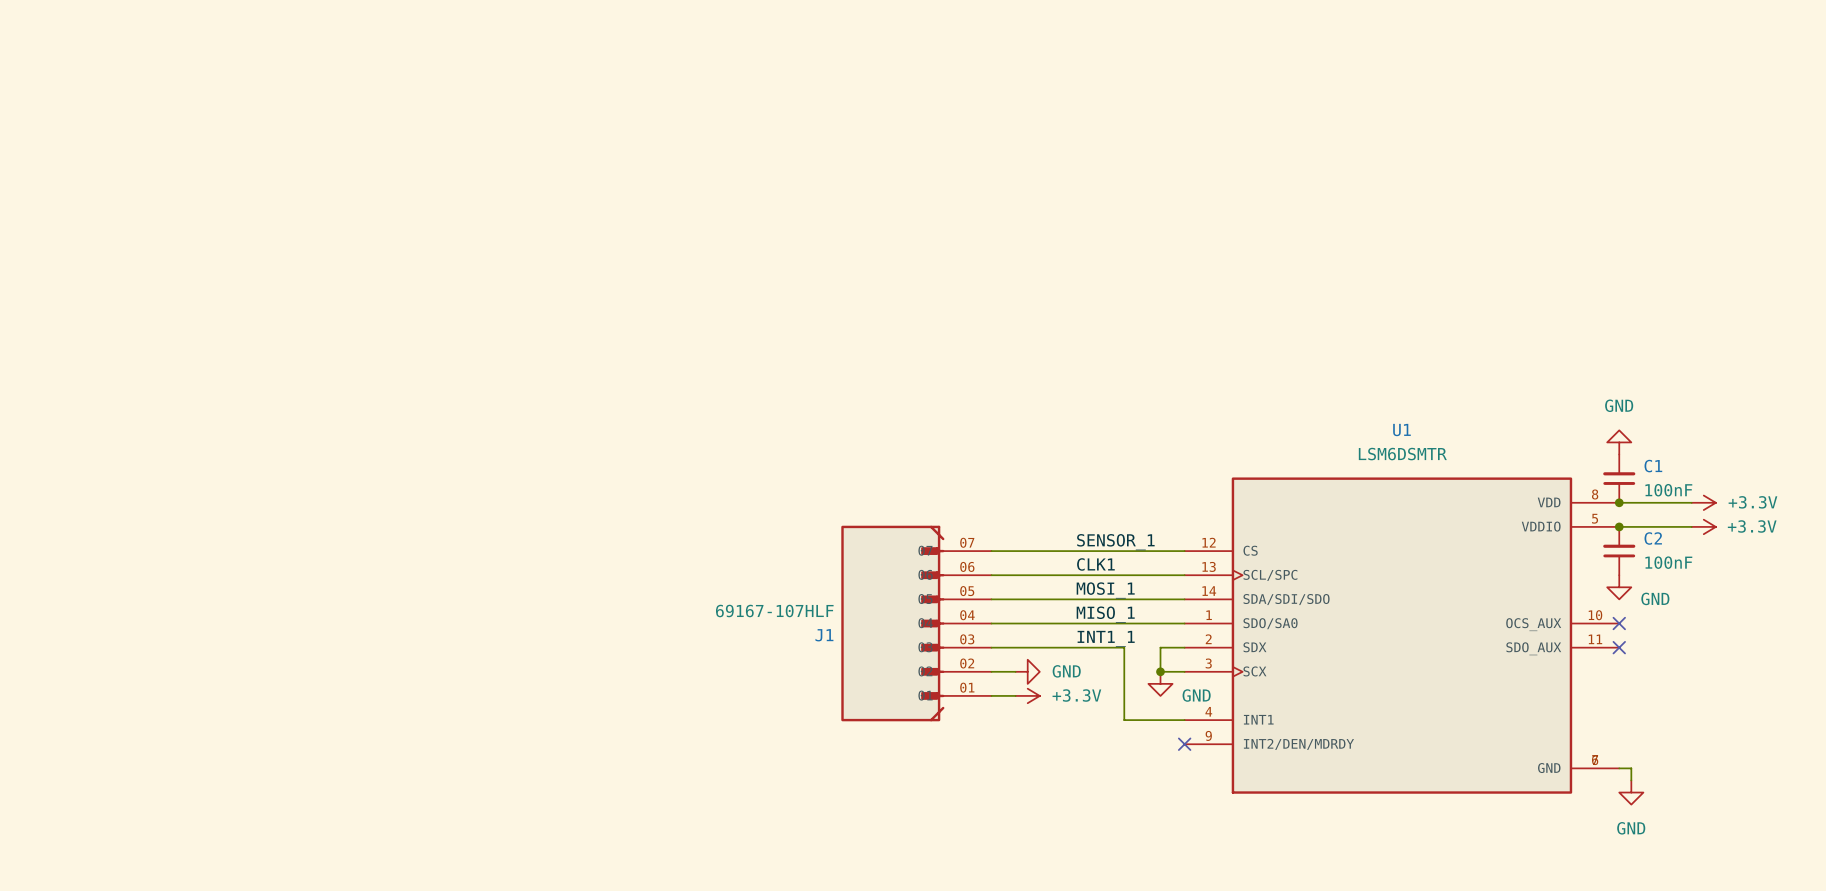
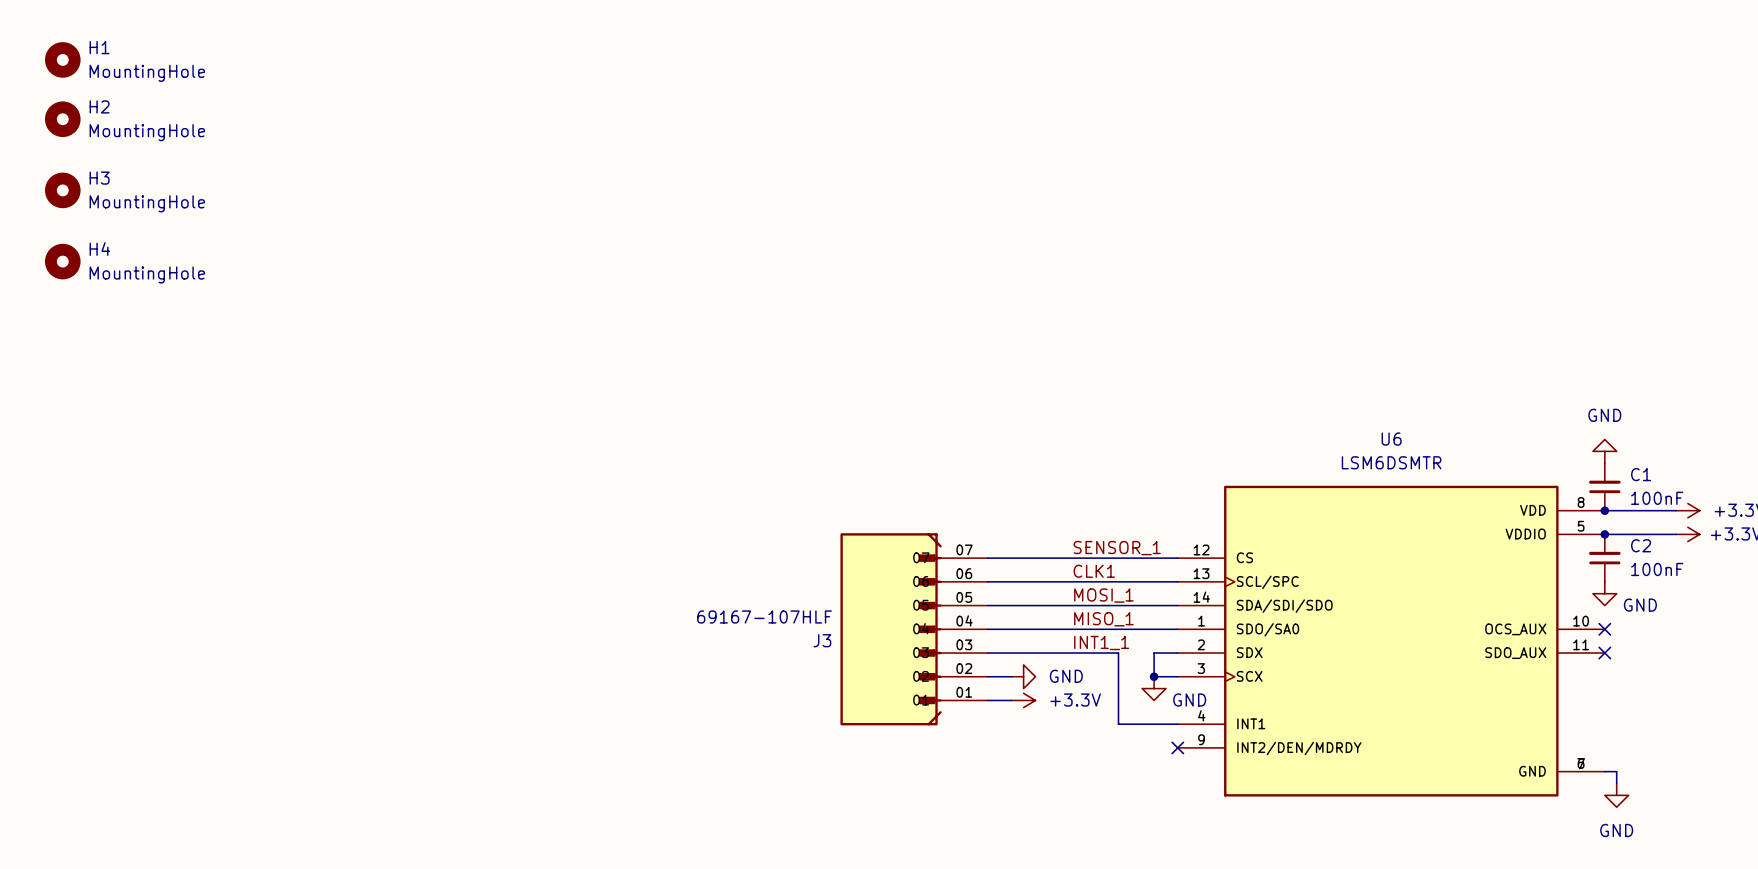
H1: none -> MountingHole (62, 59)
H2: none -> MountingHole (62, 119)
H3: none -> MountingHole (62, 190)
H4: none -> MountingHole (62, 261)
U1 name: U1 (1401, 430) -> U6 (1391, 439)
J1 name: J1 (824, 635) -> J3 (822, 640)

